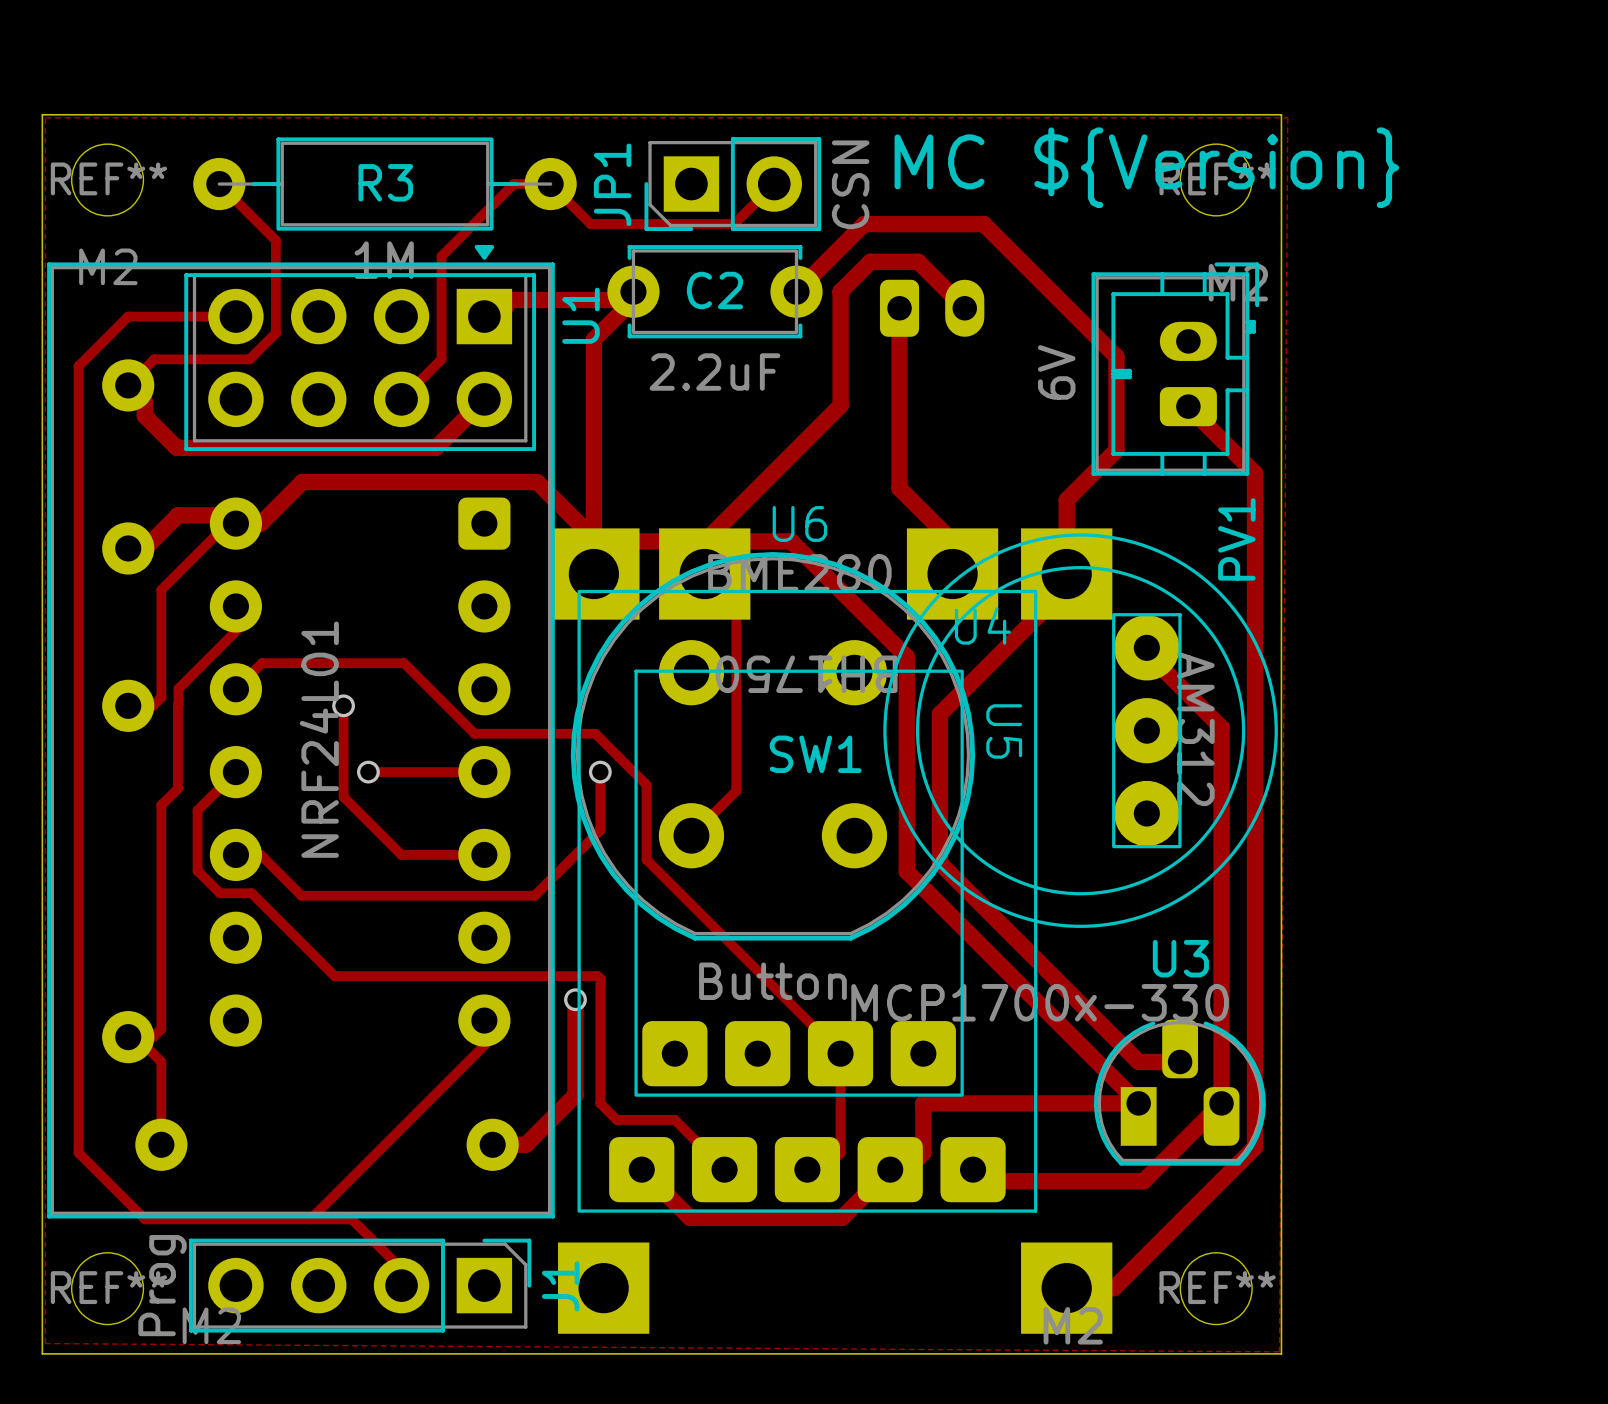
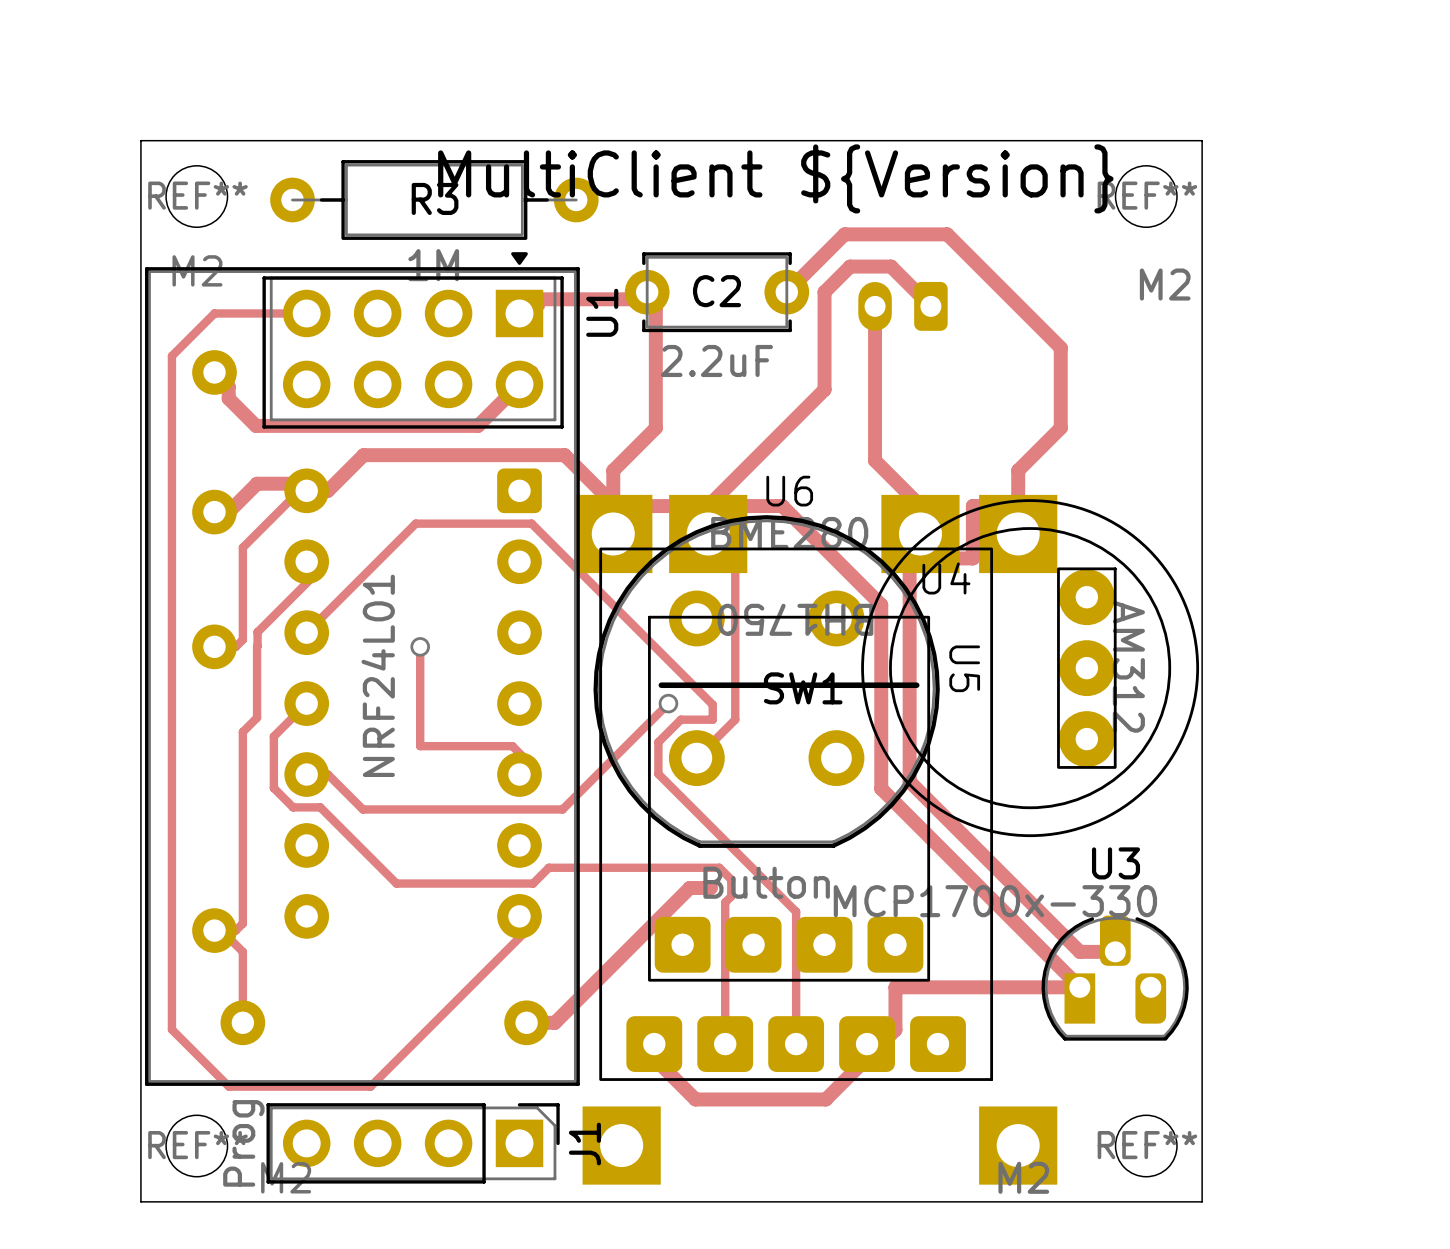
zone outline: (45, 117) (1287, 117) (1279, 1351) (45, 1343) (45, 117) -> none
text: MC ${Version} (1146, 167) -> MultiClient ${Version} (775, 178)
track: (219, 184) (275, 240) (275, 333) (249, 359) (154, 359) (128, 385) -> none
JP1: CSN (732, 184) -> none
track: (774, 184) (734, 224) (590, 224) (550, 184) (513, 184) (441, 256) (441, 359) (401, 399) -> none
track: (633, 299) (593, 339) (593, 500) -> (647, 299) (655, 307) (655, 428) (613, 470)
part rotation: 0° (932, 308) -> 180° (902, 306)
PV1: 6V (1175, 369) -> none
track: (1188, 406) (1254, 473) (1254, 1147) (1114, 1288) (1066, 1288) -> none
track: (1066, 574) (1066, 587) (939, 714) -> (1018, 506) (972, 506) (972, 558) (912, 558) (909, 561) (909, 653)
track: (1150, 647) (1150, 656) (1221, 727) (1221, 1103) (1143, 1181) (978, 1181) (973, 1176) (973, 1169) -> none
track: (261, 663) (404, 663) (474, 733) (595, 733) (646, 784) (646, 817) -> (329, 610) (415, 523) (531, 523) (712, 704) (712, 719) (680, 719) (658, 742)
track: (343, 705) (343, 796) (401, 854) (484, 854) -> (420, 646) (420, 746) (512, 746) (526, 760) (526, 767) (519, 774)
via position: (343, 705) -> (420, 646)
line: none -> (661, 685) (916, 685)
track: (368, 772) (484, 772) -> none
via: (368, 772) -> none
track: (600, 772) (600, 830) -> (668, 703) (618, 753)
via position: (600, 772) -> (668, 703)
track: (646, 854) (646, 859) (840, 1053) (840, 1153) (823, 1169) (807, 1169) -> (658, 774) (796, 911) (796, 1058)
track: (334, 976) (597, 976) (600, 978) (600, 1103) (616, 1119) (674, 1119) (724, 1169) -> (391, 878) (396, 883) (533, 883) (548, 867) (719, 867) (731, 879) (731, 896) (725, 902) (725, 1058)
track: (575, 999) (575, 1095) -> (711, 888) (689, 888) (597, 980)
via: (575, 999) -> none
track: (641, 1169) (689, 1217) (842, 1217) (890, 1169) (906, 1169) -> (654, 1058) (695, 1099) (825, 1099) (881, 1044)
track: (310, 1219) (351, 1219) (401, 1269) (401, 1285) -> none

